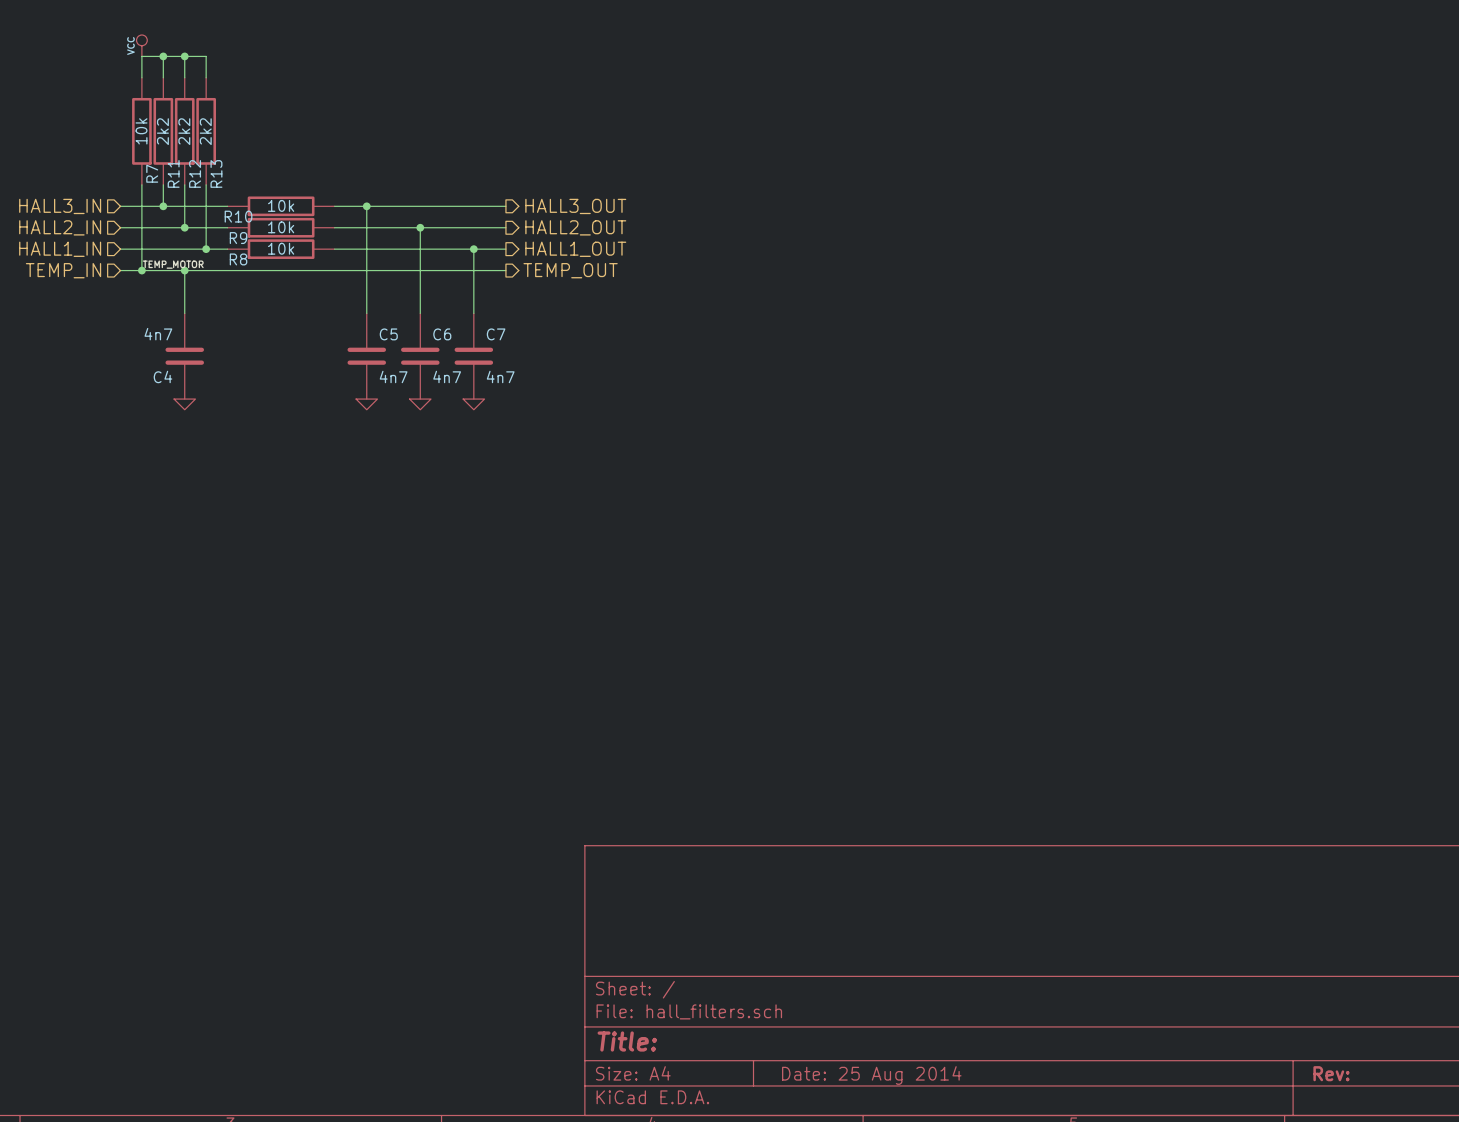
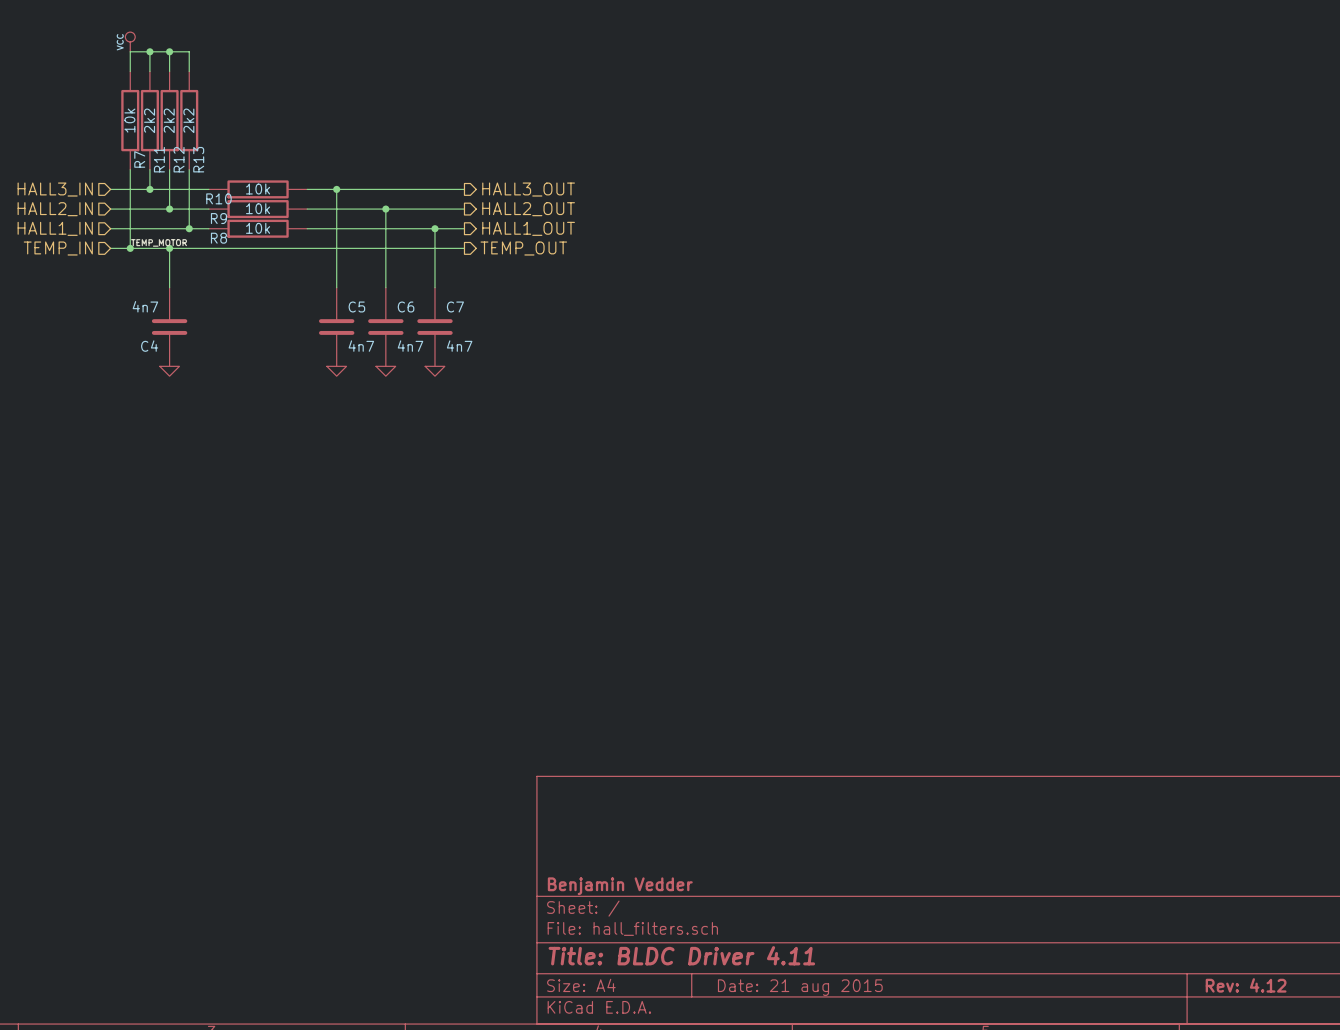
title block: none -> Benjamin Vedder (620, 886)
title block: Title: (627, 1041) -> Title: BLDC Driver 4.11 (681, 955)
title block: Rev: (1331, 1073) -> Rev: 4.12 (1246, 985)
title block: Date: 25 Aug 2014 (871, 1075) -> Date: 21 aug 2015 (800, 987)

